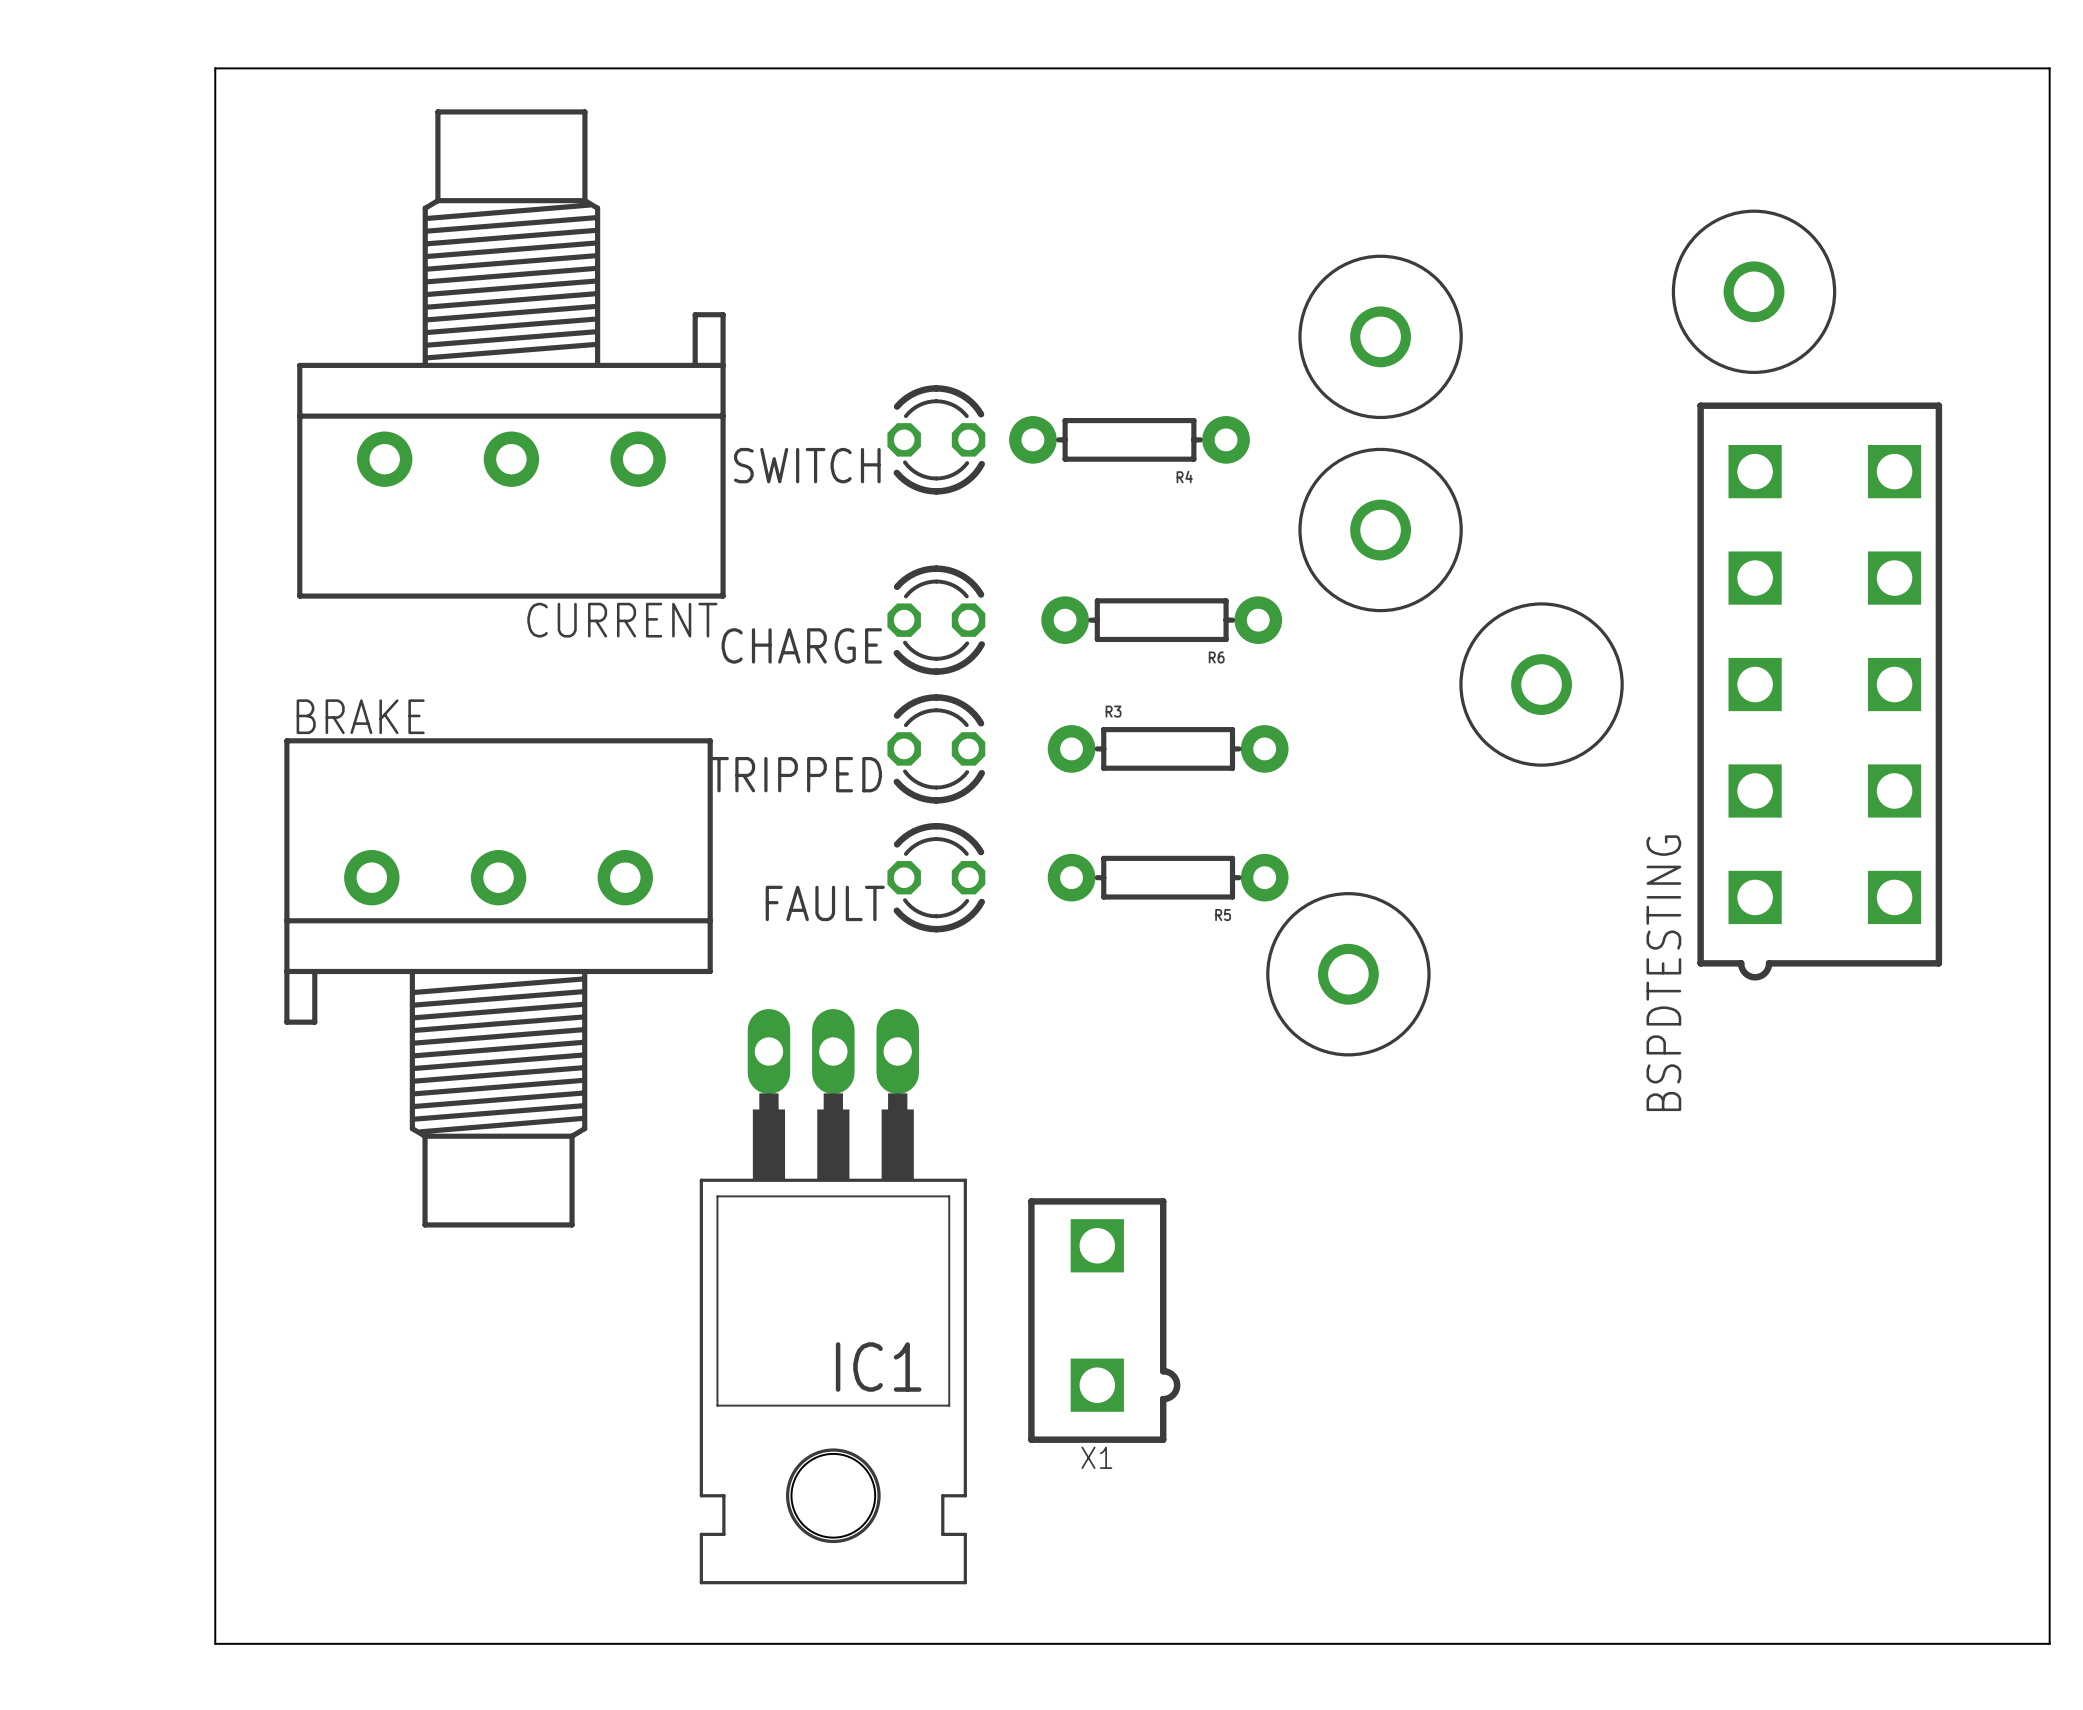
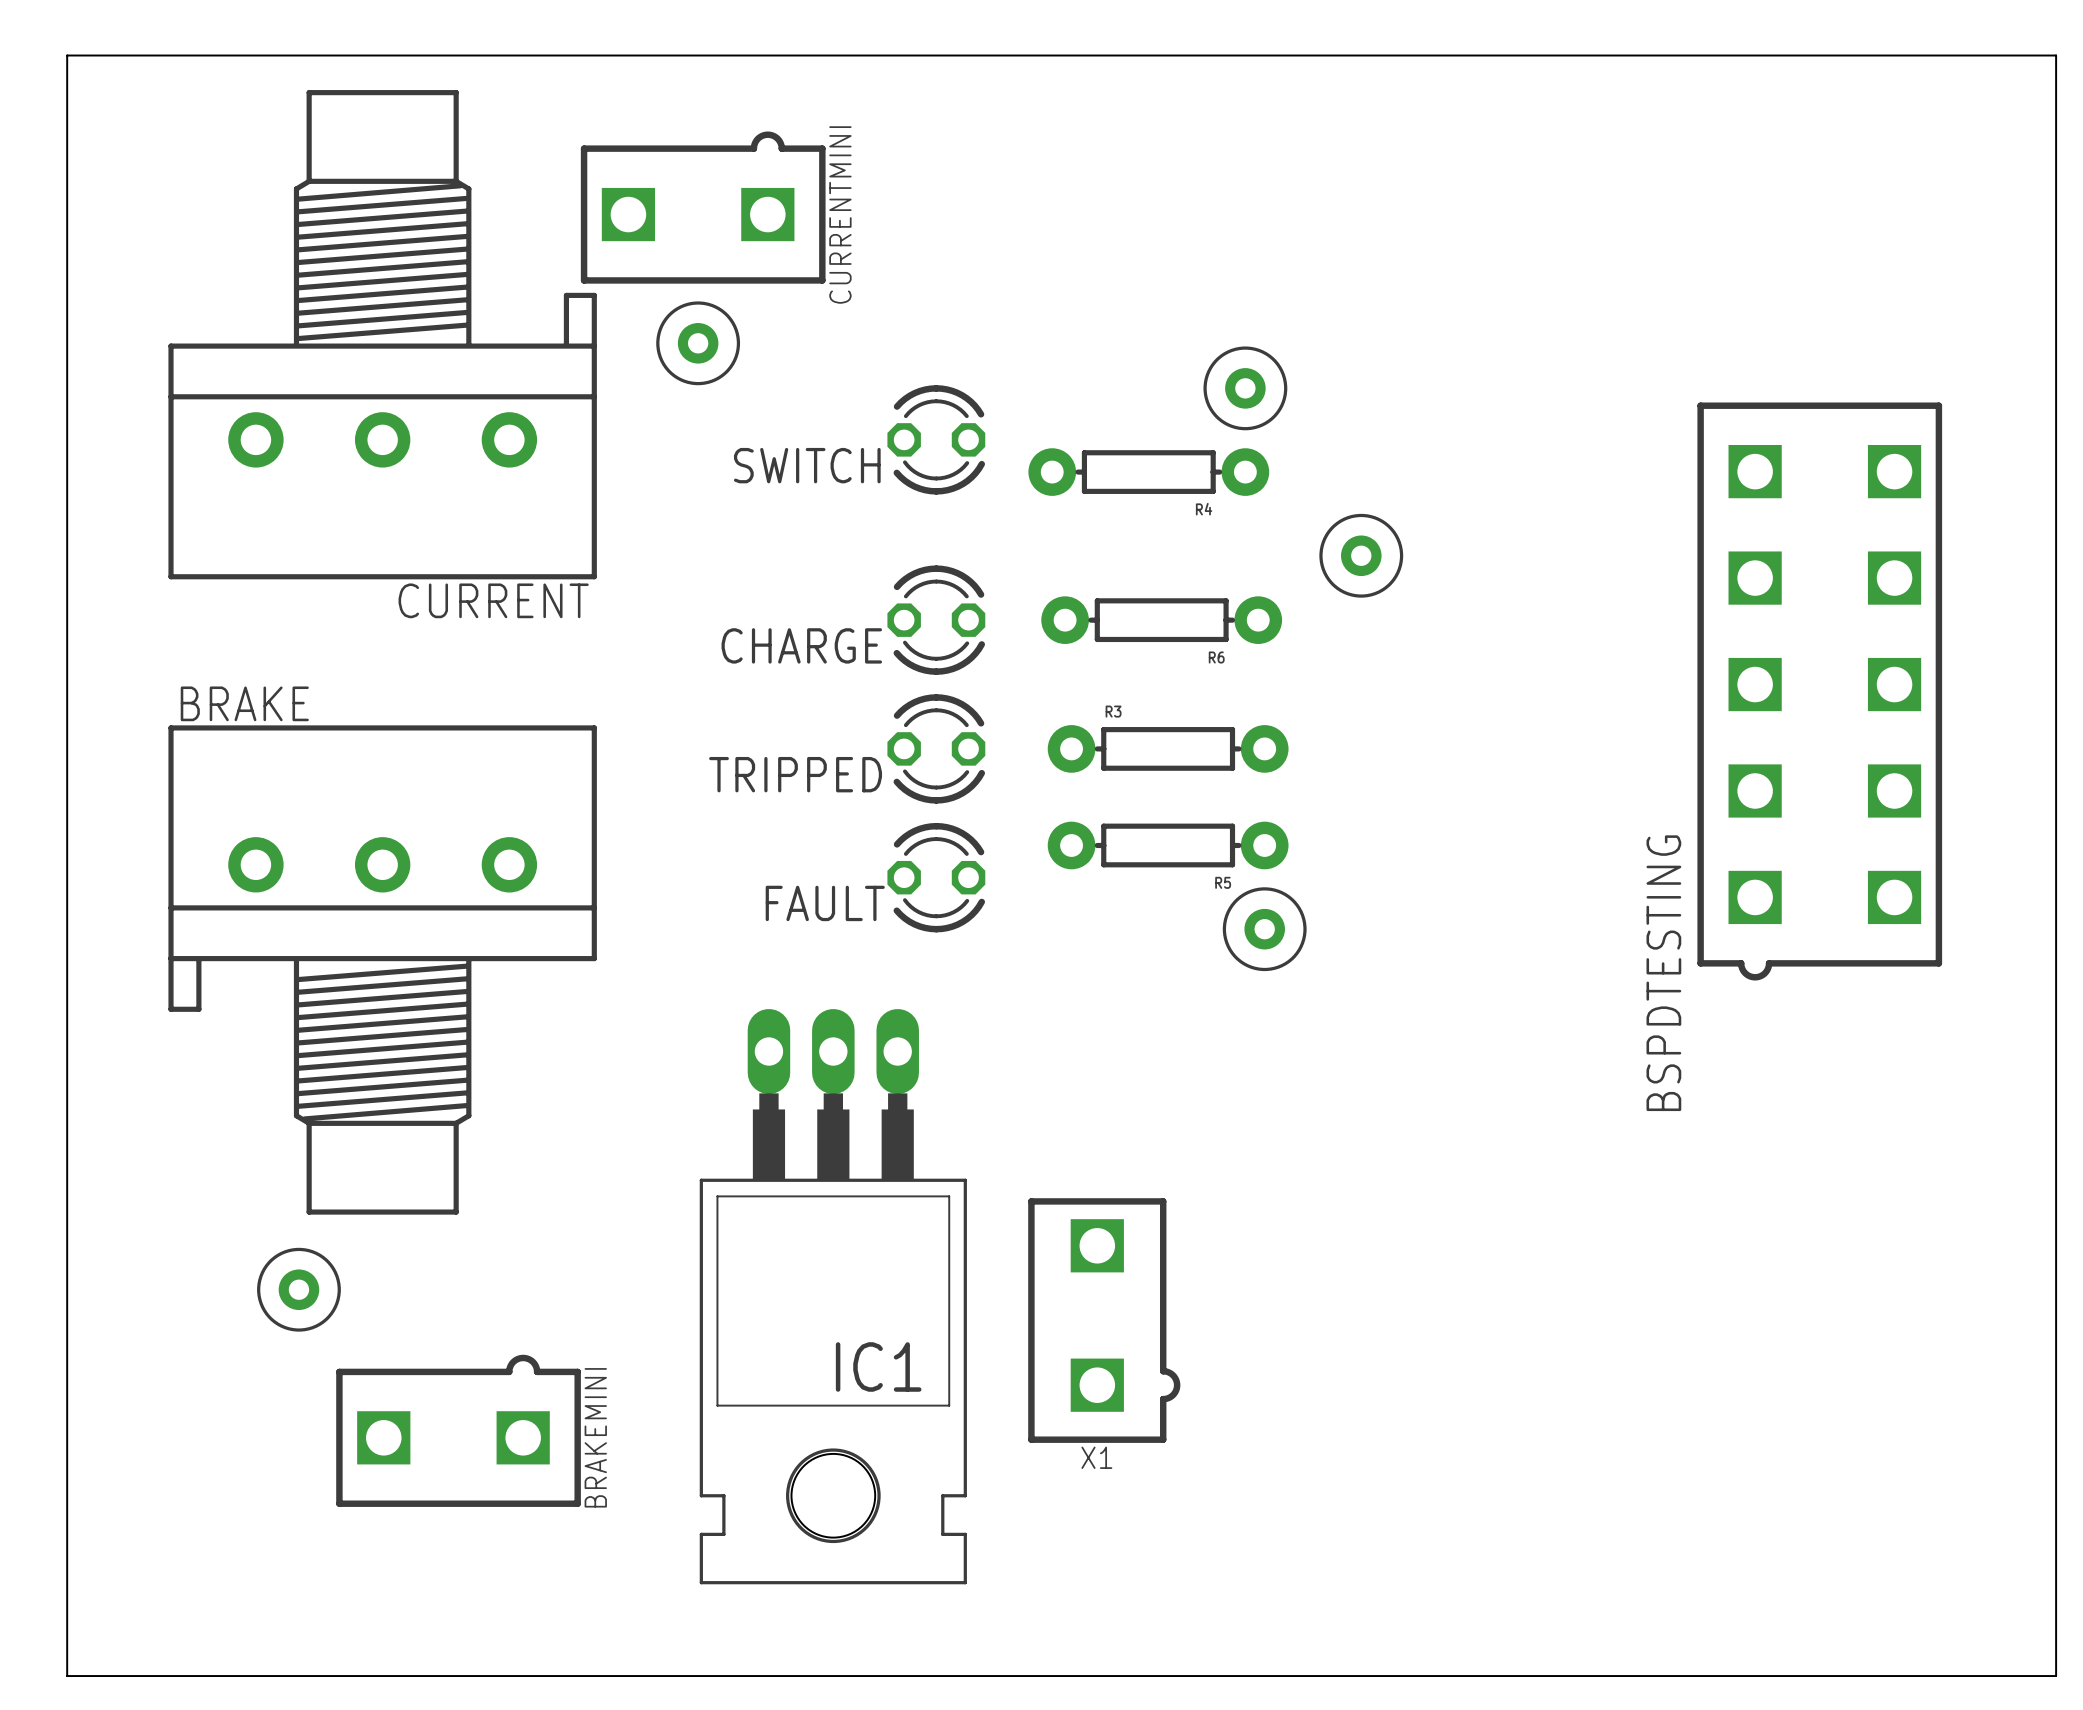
board edge: (215, 68) (2049, 68) (2049, 1643) (215, 1643) (215, 68) -> (67, 55) (67, 1676) (2056, 1676) (2056, 55) (67, 55)
CURRENTMINI: none -> (703, 207)
part: (1754, 291) -> none
part: (1380, 336) -> none
part: none -> (698, 343)
CURRENT position: (511, 354) -> (382, 334)
part: none -> (1245, 388)
R4 position: (1129, 439) -> (1148, 472)
part: (1380, 530) -> none
part: none -> (1361, 555)
part: (1541, 684) -> none
R5 position: (1168, 877) -> (1168, 845)
part: none -> (1264, 929)
part: (1348, 974) -> none
BRAKE position: (498, 982) -> (382, 970)
part: none -> (298, 1289)
BRAKEMINI: none -> (458, 1430)

